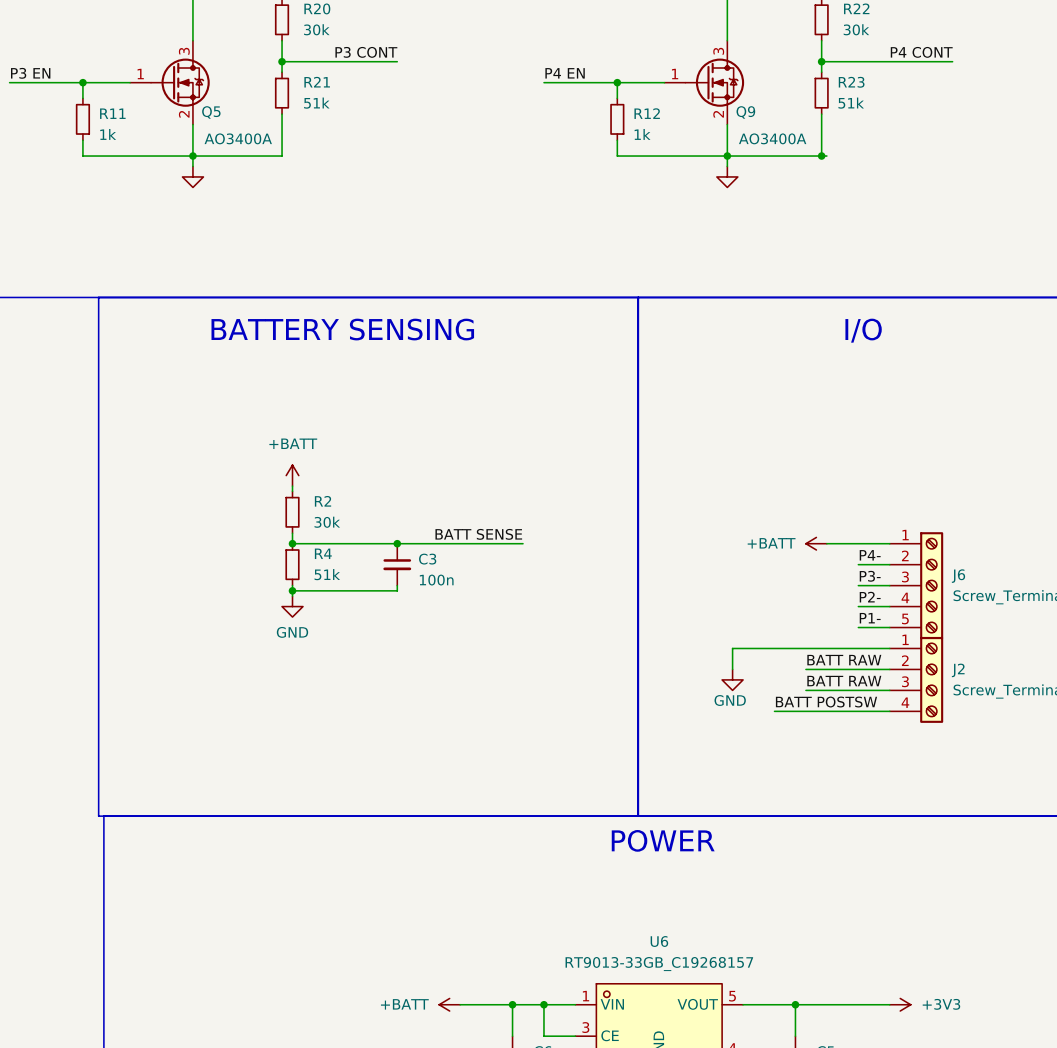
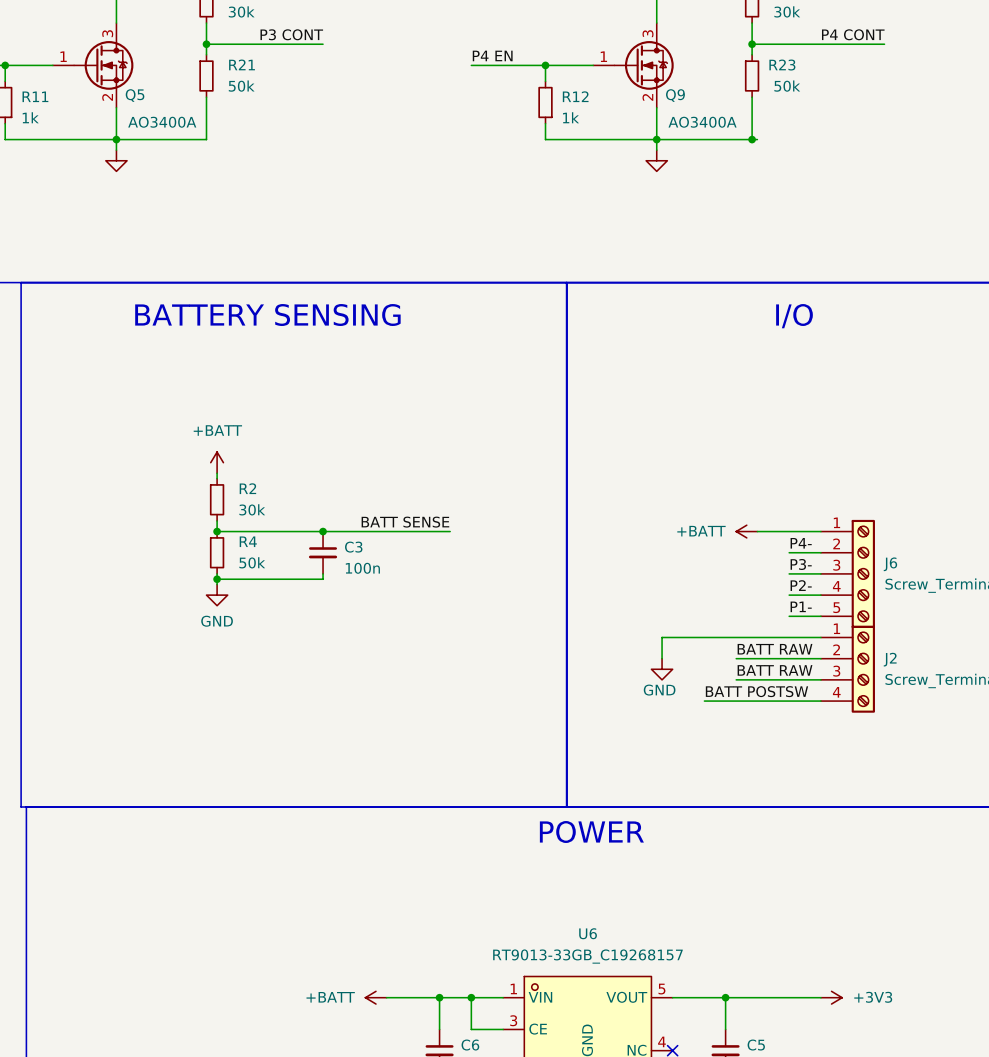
R21 value: 51k (316, 103) -> 50k (241, 86)
R23 value: 51k (851, 103) -> 50k (787, 86)
R4 value: 51k (327, 574) -> 50k (252, 562)

